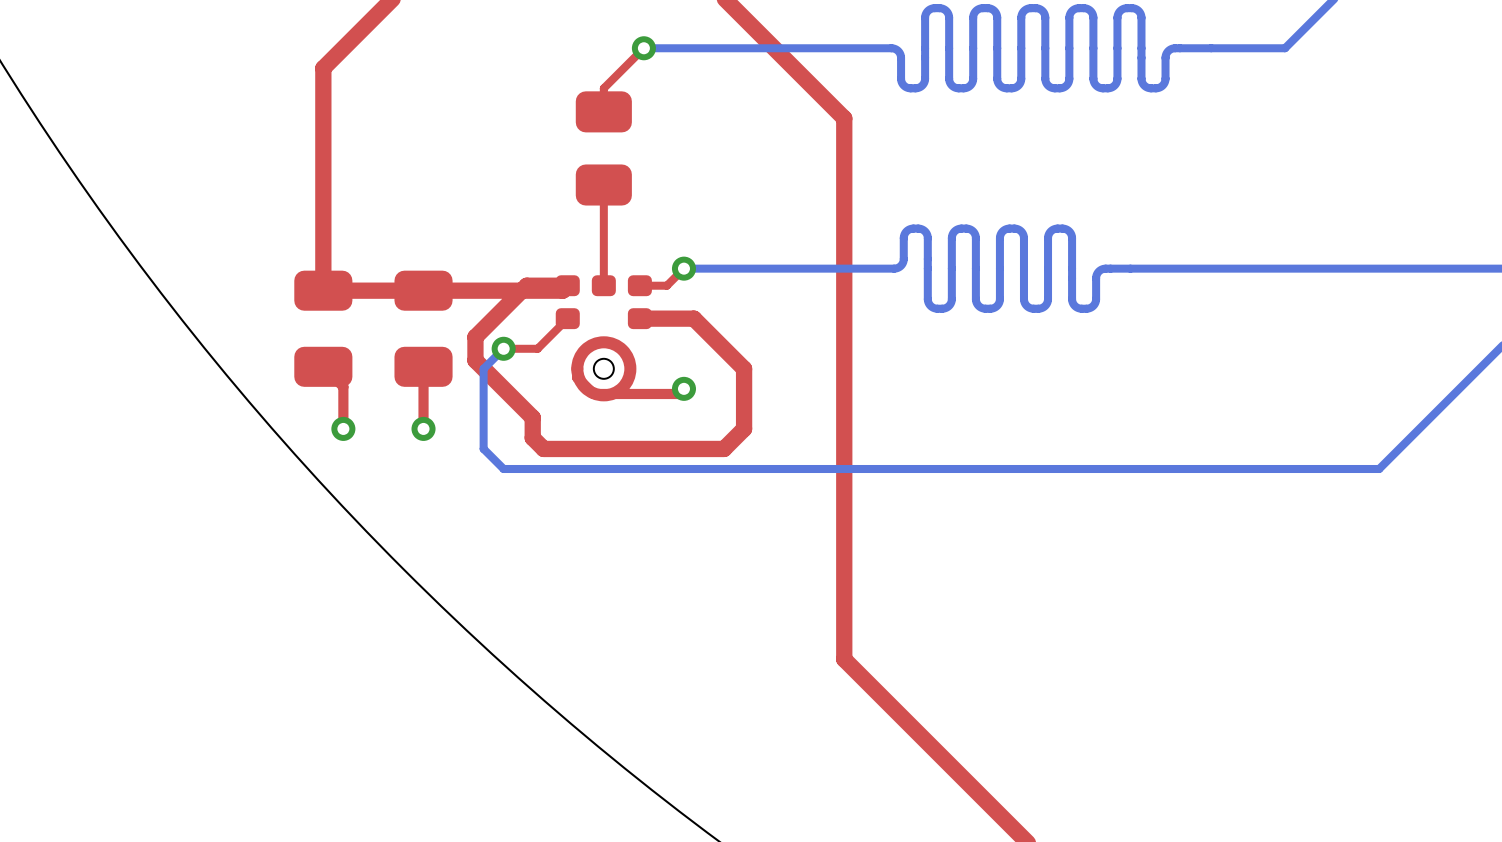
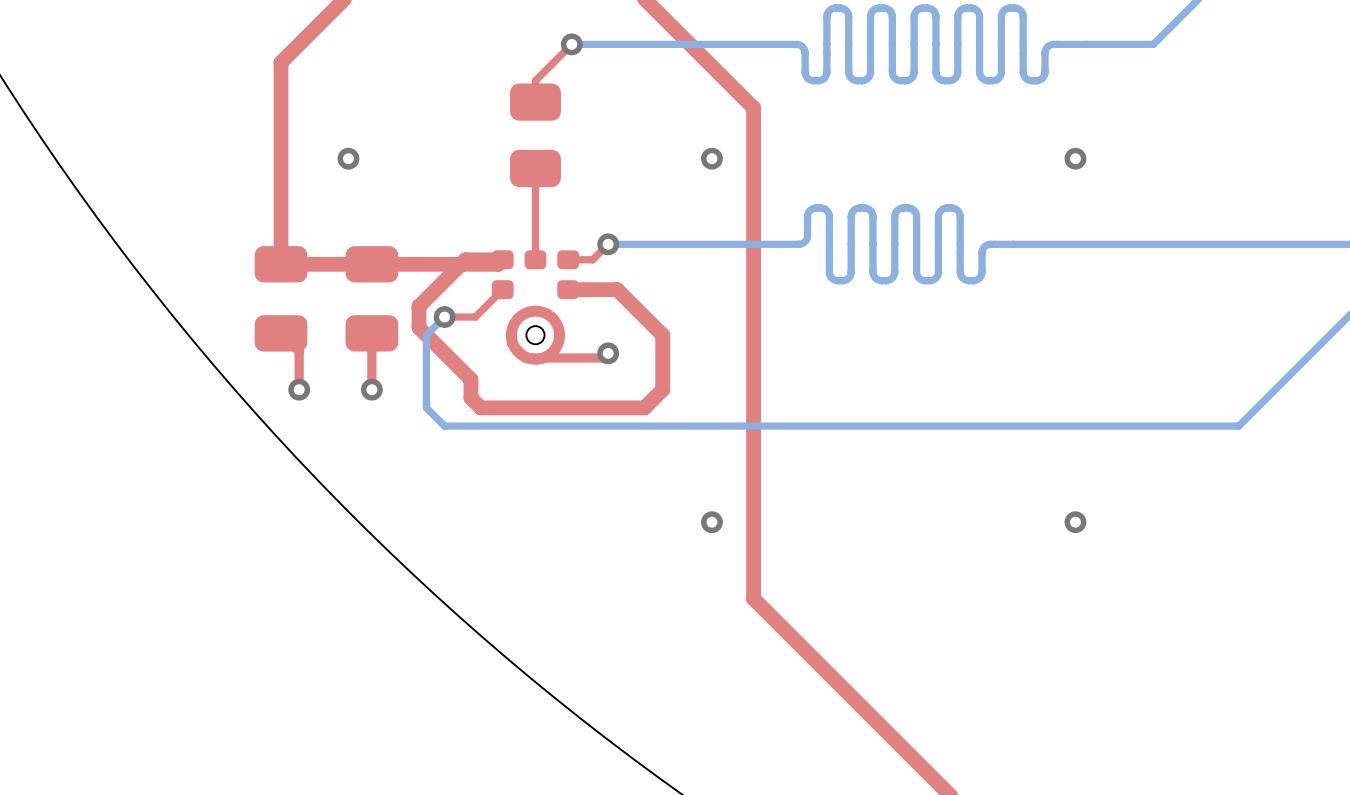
via: none -> (348, 158)
via: none -> (711, 158)
via: none -> (1075, 158)
via: none -> (711, 522)
via: none -> (1075, 522)

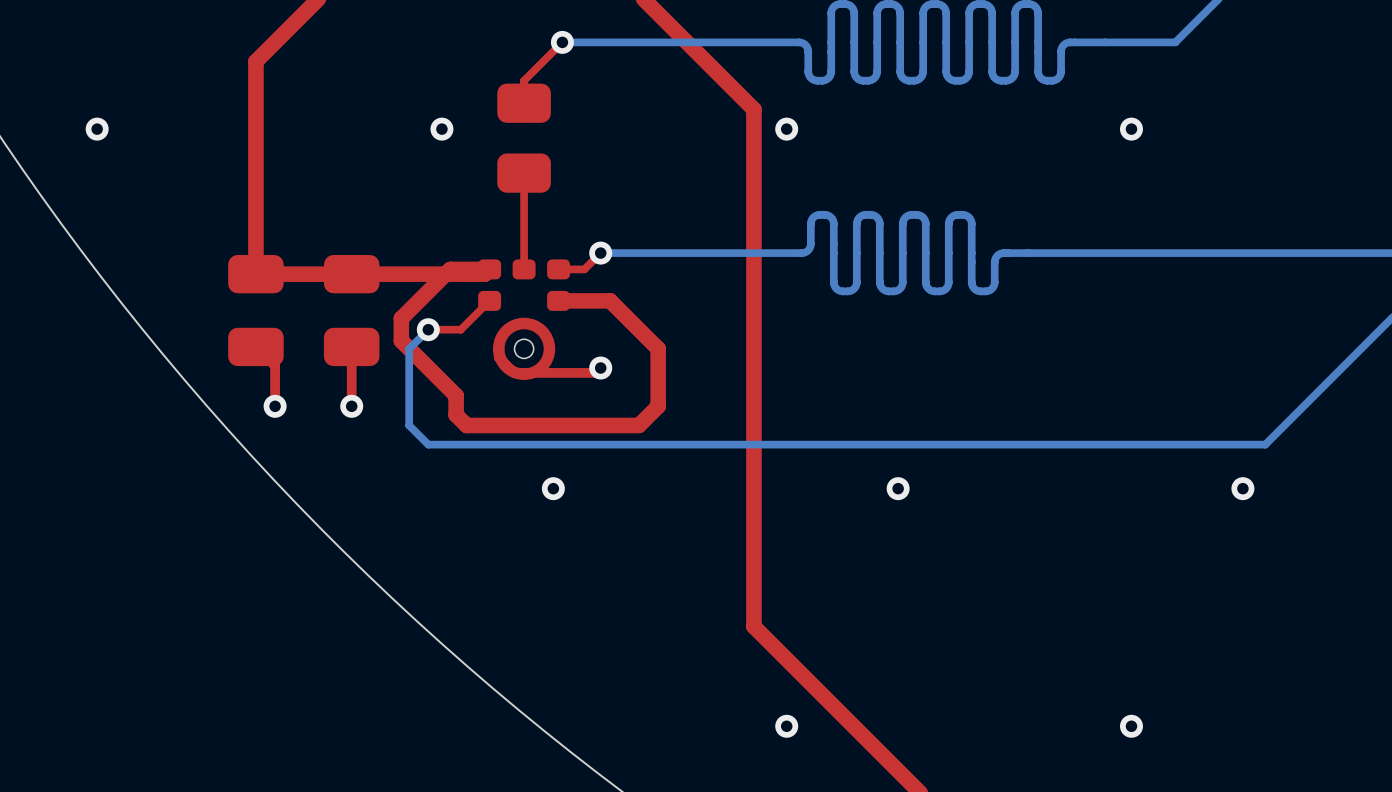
via: none -> (97, 129)
via: none -> (441, 129)
via: (348, 158) -> none
via position: (711, 158) -> (786, 129)
via position: (1075, 158) -> (1131, 129)
via: none -> (553, 488)
via: none -> (898, 488)
via: none -> (1242, 488)
via: (711, 522) -> none
via: (1075, 522) -> none
via: none -> (786, 726)
via: none -> (1131, 726)

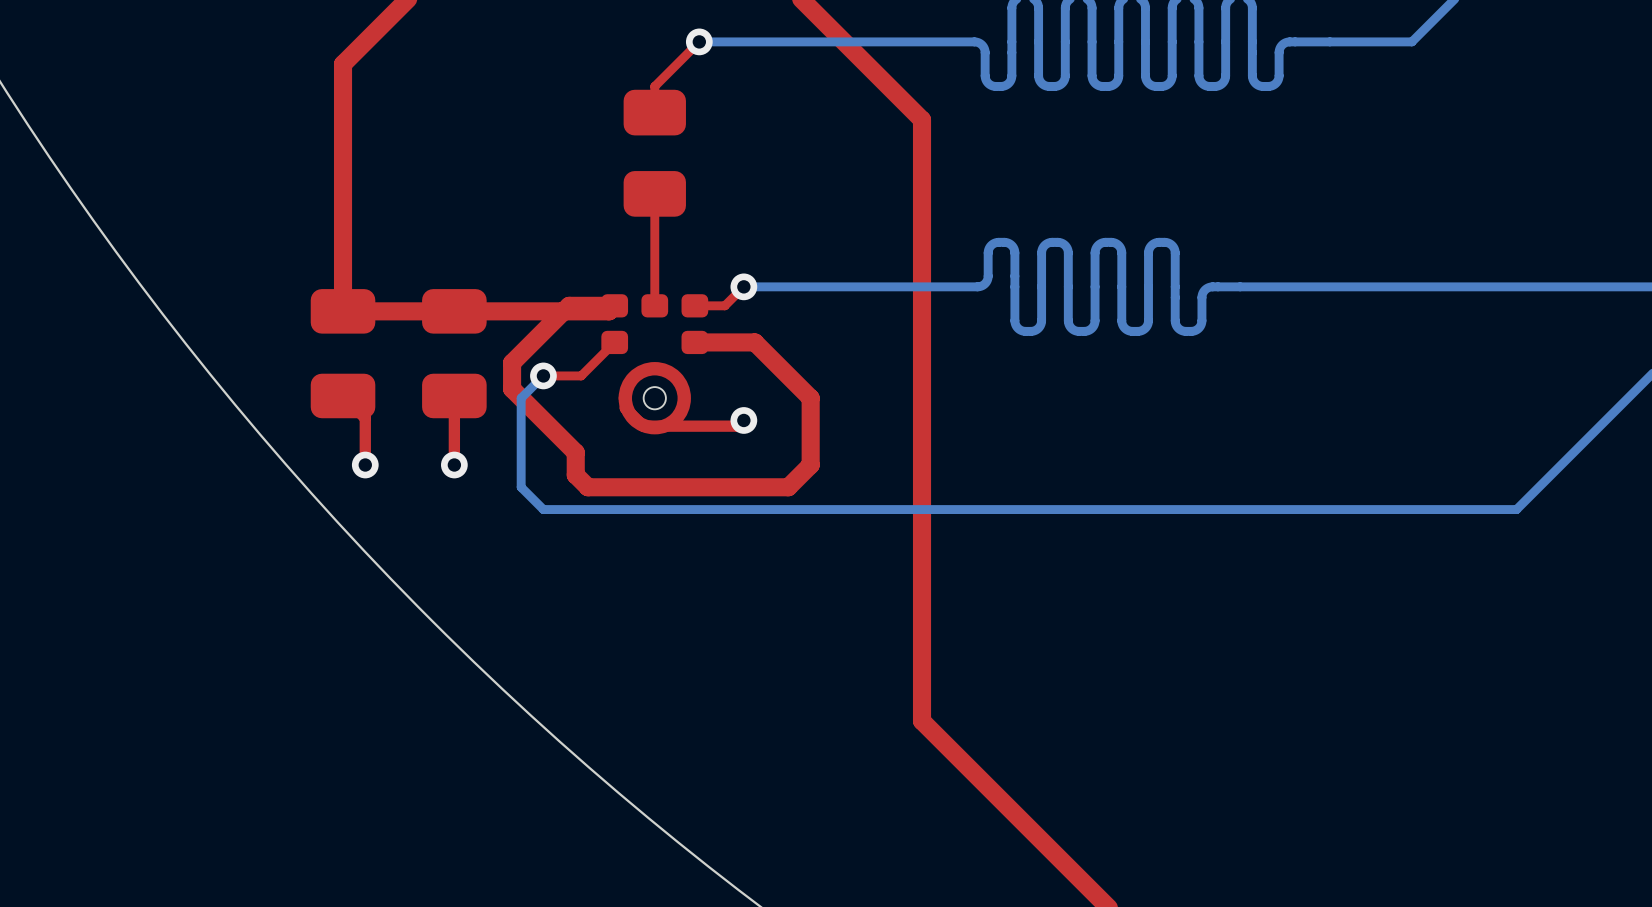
via: (97, 129) -> none
via: (441, 129) -> none
via: (786, 129) -> none
via: (1131, 129) -> none
via: (553, 488) -> none
via: (898, 488) -> none
via: (1242, 488) -> none
via: (786, 726) -> none
via: (1131, 726) -> none

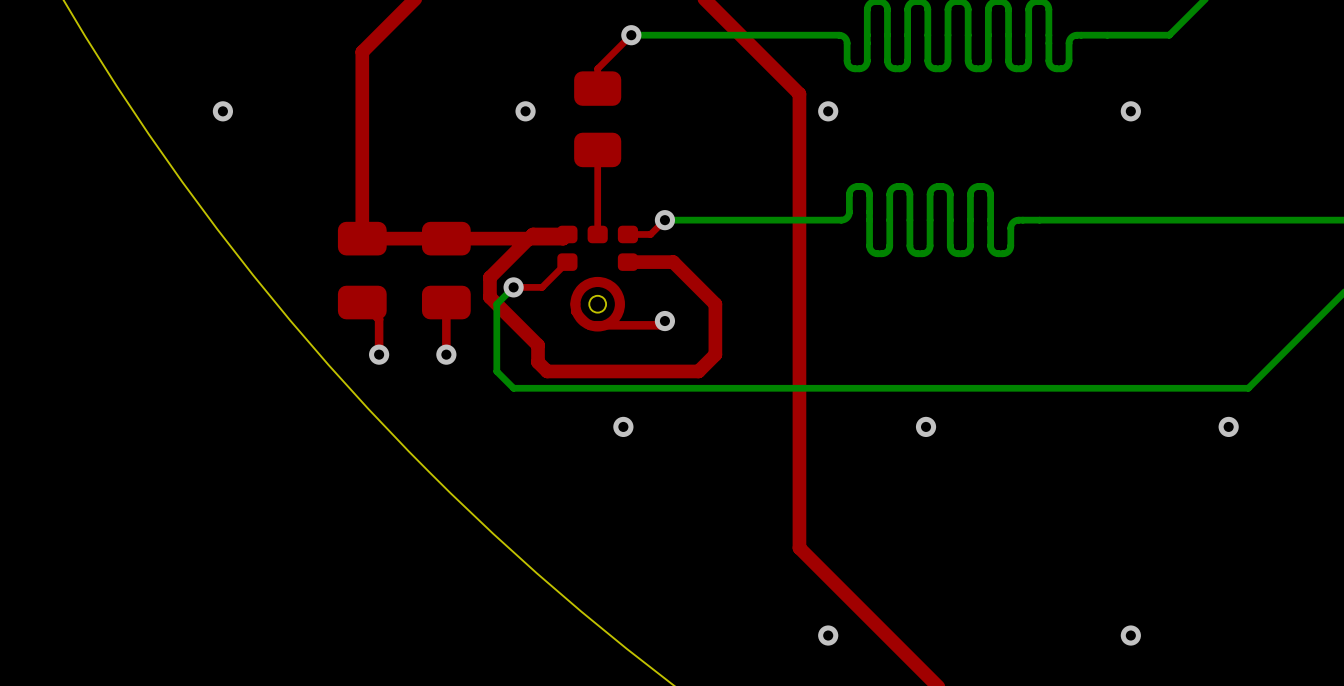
via: none -> (222, 111)
via: none -> (525, 111)
via: none -> (828, 111)
via: none -> (1130, 111)
via: none -> (623, 426)
via: none -> (926, 426)
via: none -> (1228, 426)
via: none -> (828, 635)
via: none -> (1130, 635)

